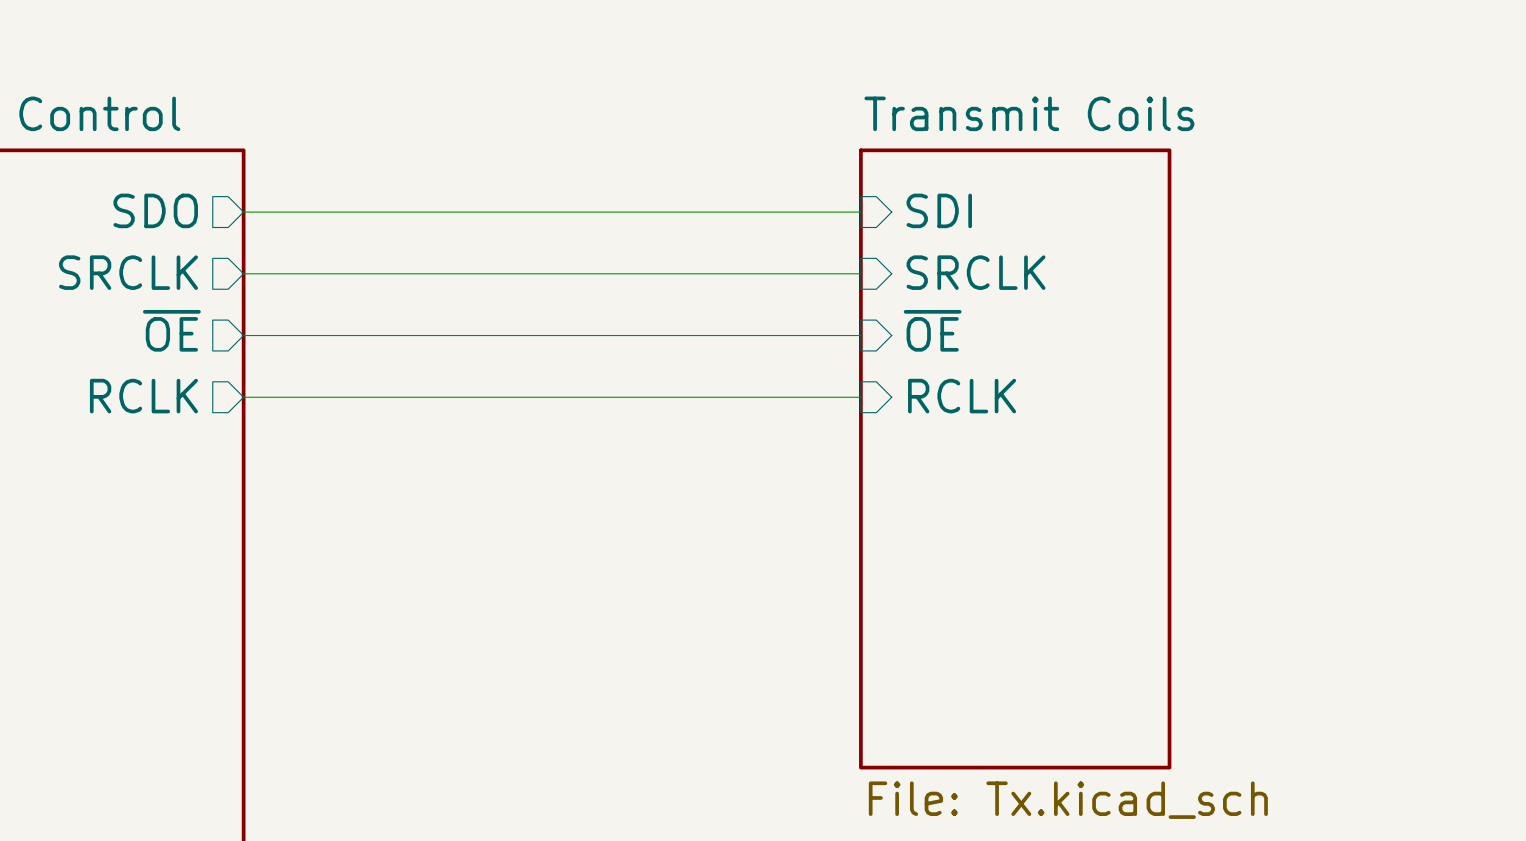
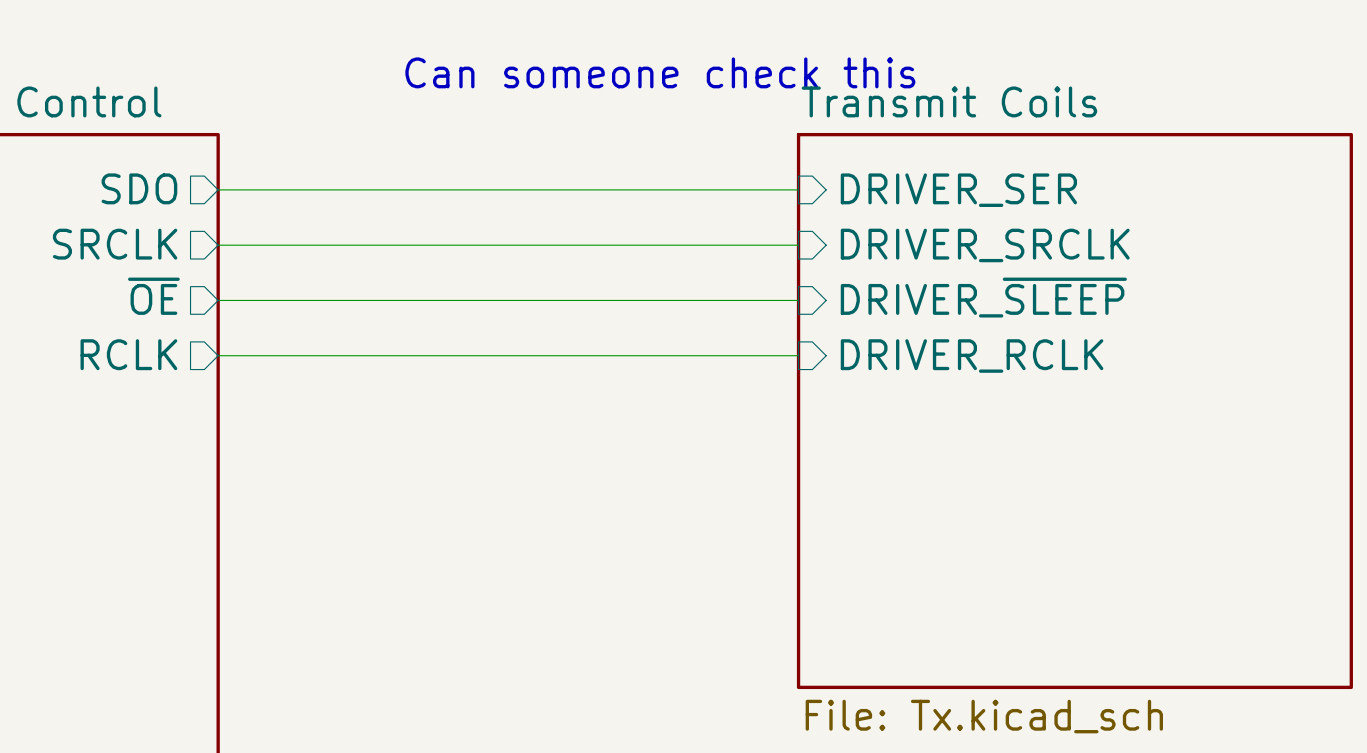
text: none -> Can someone check this (660, 72)
sheet pin: SDI (939, 210) -> none
wire: none -> (770, 189) (798, 189)
sheet pin: none -> DRIVER_SER (958, 190)
sheet pin: SRCLK (976, 272) -> none
wire: none -> (770, 245) (798, 245)
sheet pin: none -> DRIVER_SRCLK (985, 245)
sheet pin: ~{OE} (932, 330) -> none
sheet pin: none -> DRIVER_~{SLEEP} (983, 297)
wire: none -> (770, 300) (798, 300)
sheet pin: RCLK (962, 396) -> none
wire: none -> (770, 355) (798, 355)
sheet pin: none -> DRIVER_RCLK (972, 356)
sheet Transmit Coils: File: Tx.kicad_sch (1015, 458) -> none
sheet Transmit Coils: none -> File: Tx.kicad_sch (1074, 411)

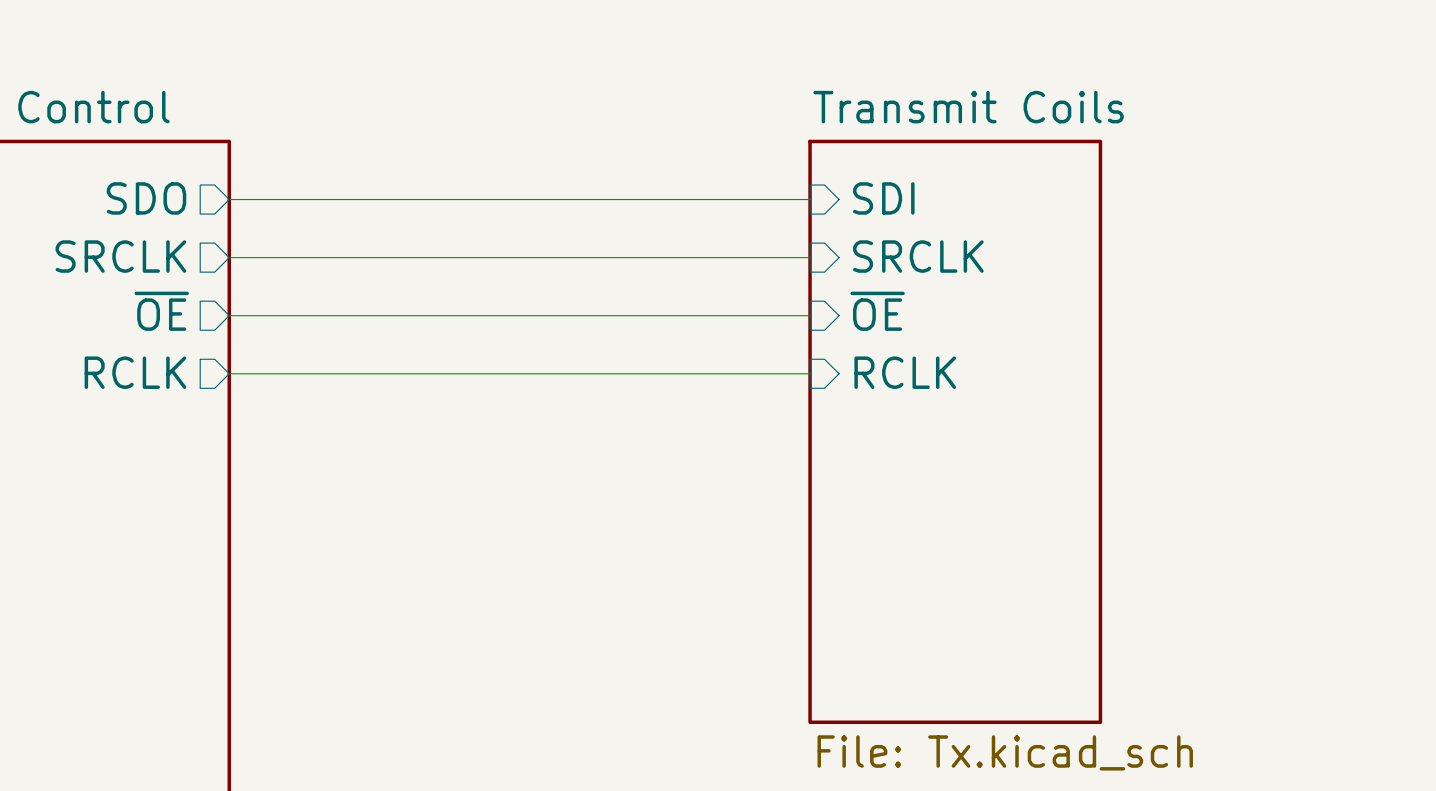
text: Can someone check this (660, 72) -> none
sheet pin: none -> SDI (883, 198)
wire: (770, 189) (798, 189) -> none
sheet pin: DRIVER_SER (958, 190) -> none
sheet pin: none -> SRCLK (918, 256)
wire: (770, 245) (798, 245) -> none
sheet pin: DRIVER_SRCLK (985, 245) -> none
sheet pin: none -> ~{OE} (877, 311)
sheet pin: DRIVER_~{SLEEP} (983, 297) -> none
wire: (770, 300) (798, 300) -> none
sheet pin: none -> RCLK (905, 372)
wire: (770, 355) (798, 355) -> none
sheet pin: DRIVER_RCLK (972, 356) -> none
sheet Transmit Coils: none -> File: Tx.kicad_sch (955, 431)
sheet Transmit Coils: File: Tx.kicad_sch (1074, 411) -> none

